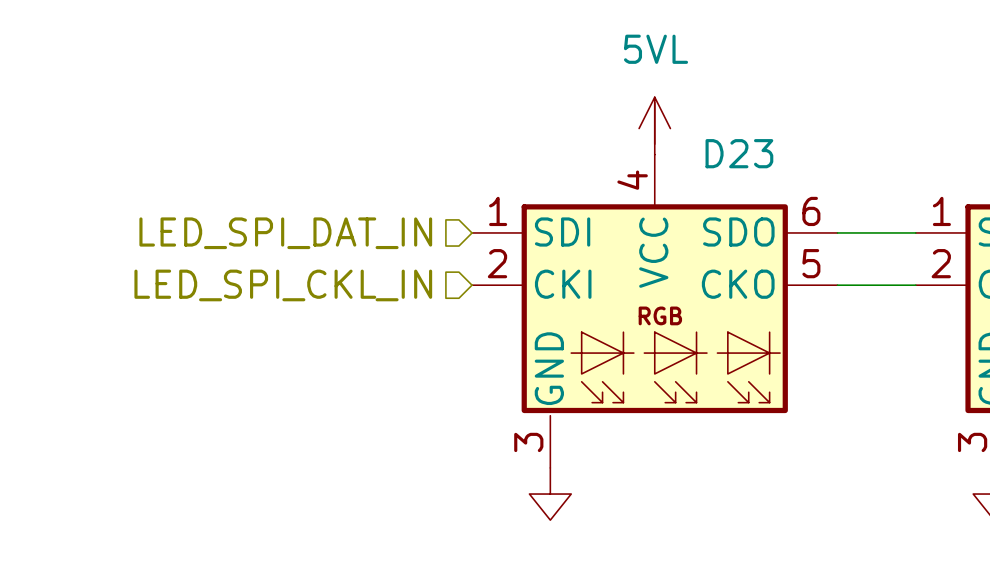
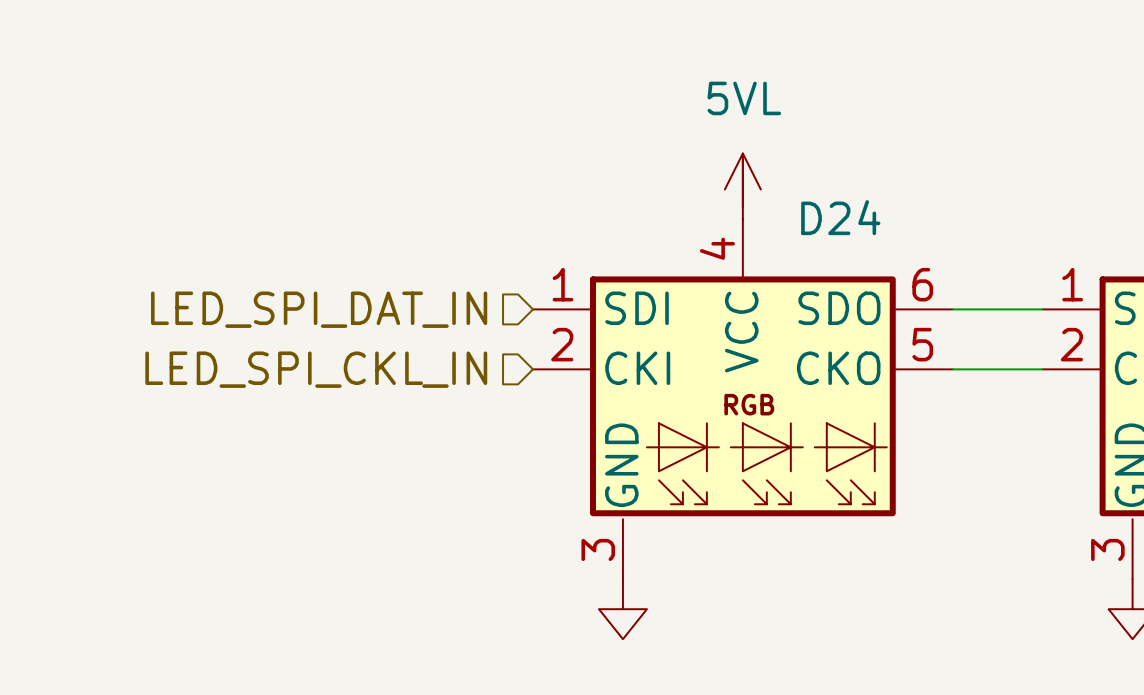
D23 name: D23 (739, 153) -> D24 (840, 217)

